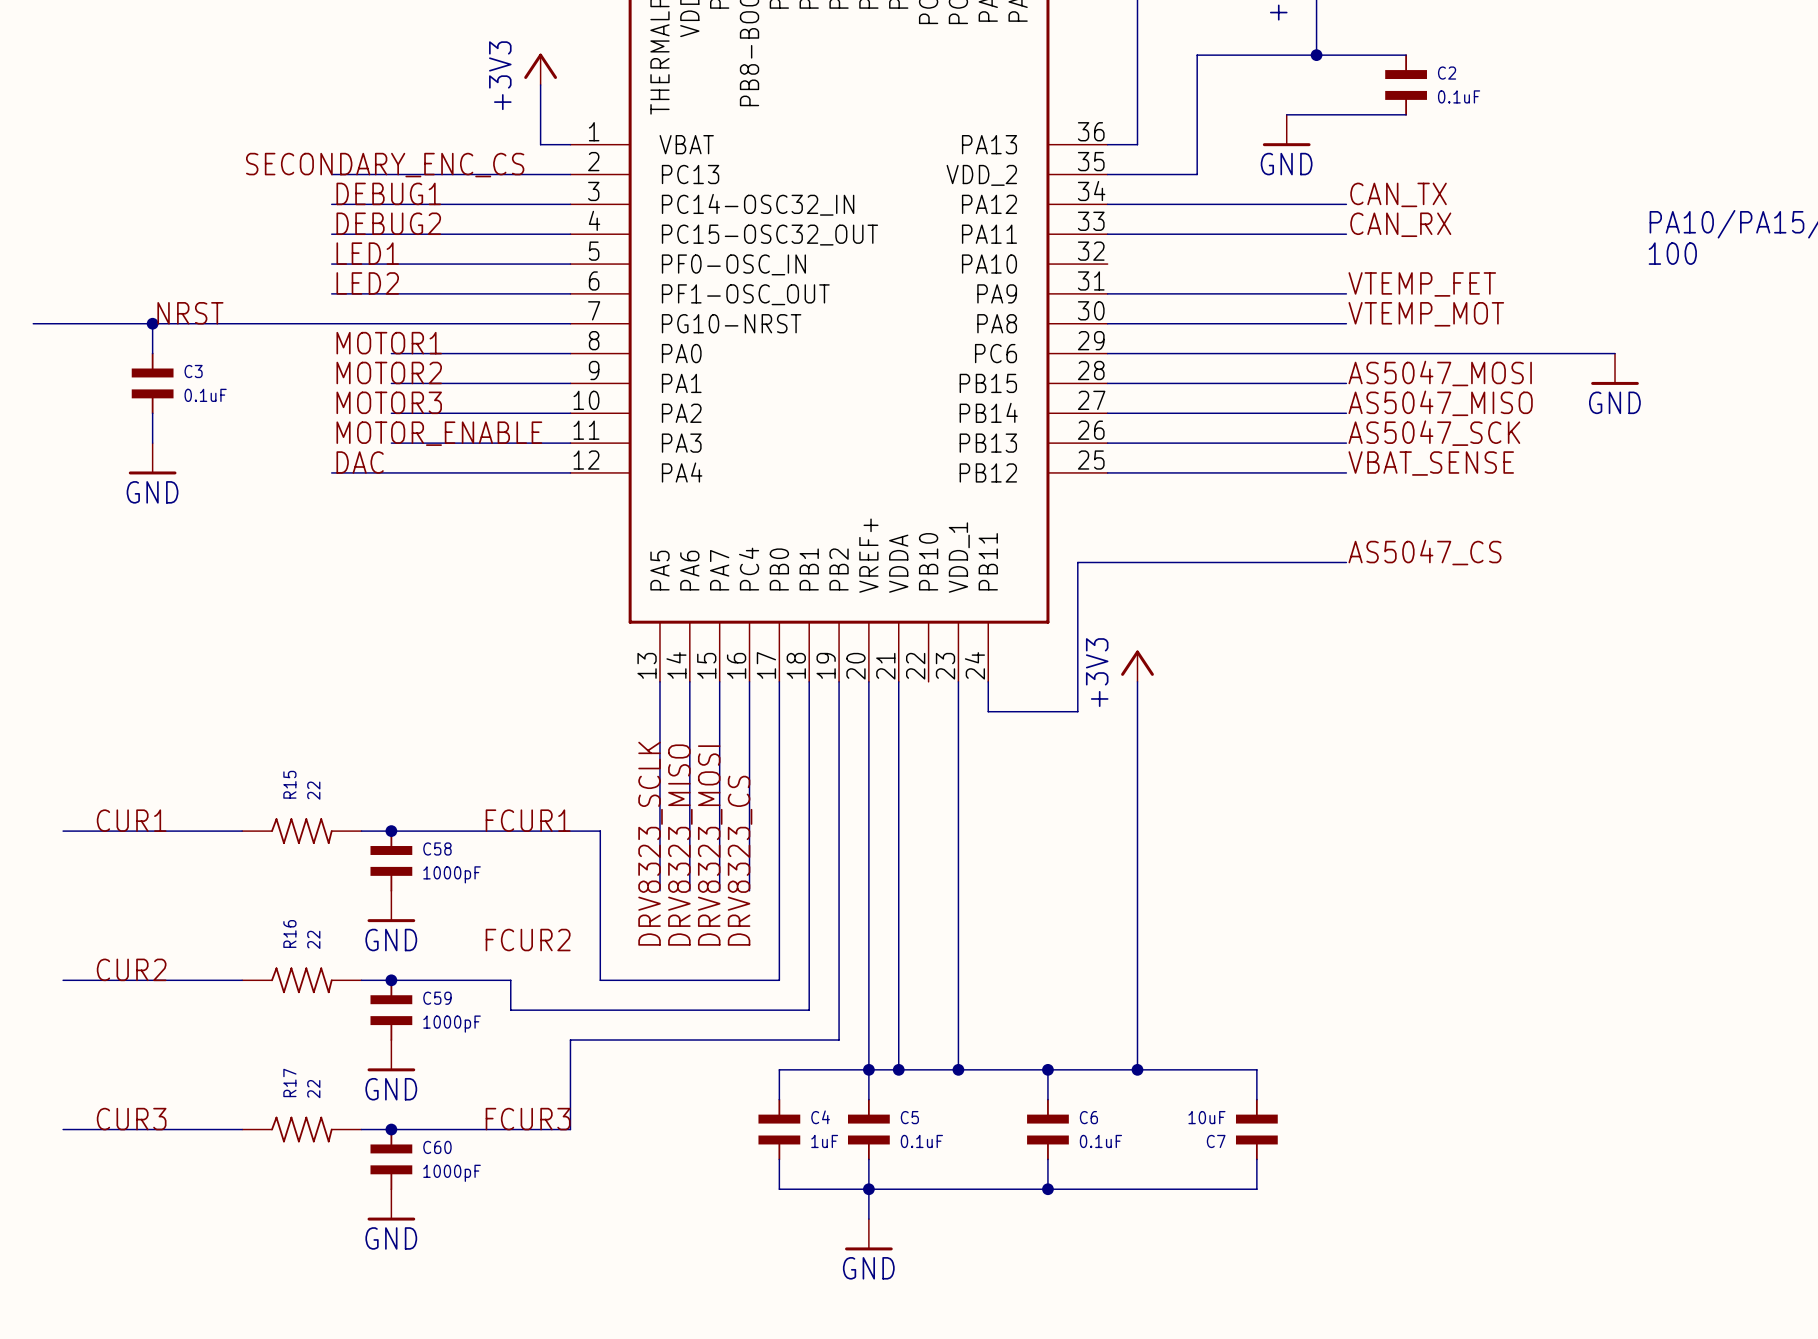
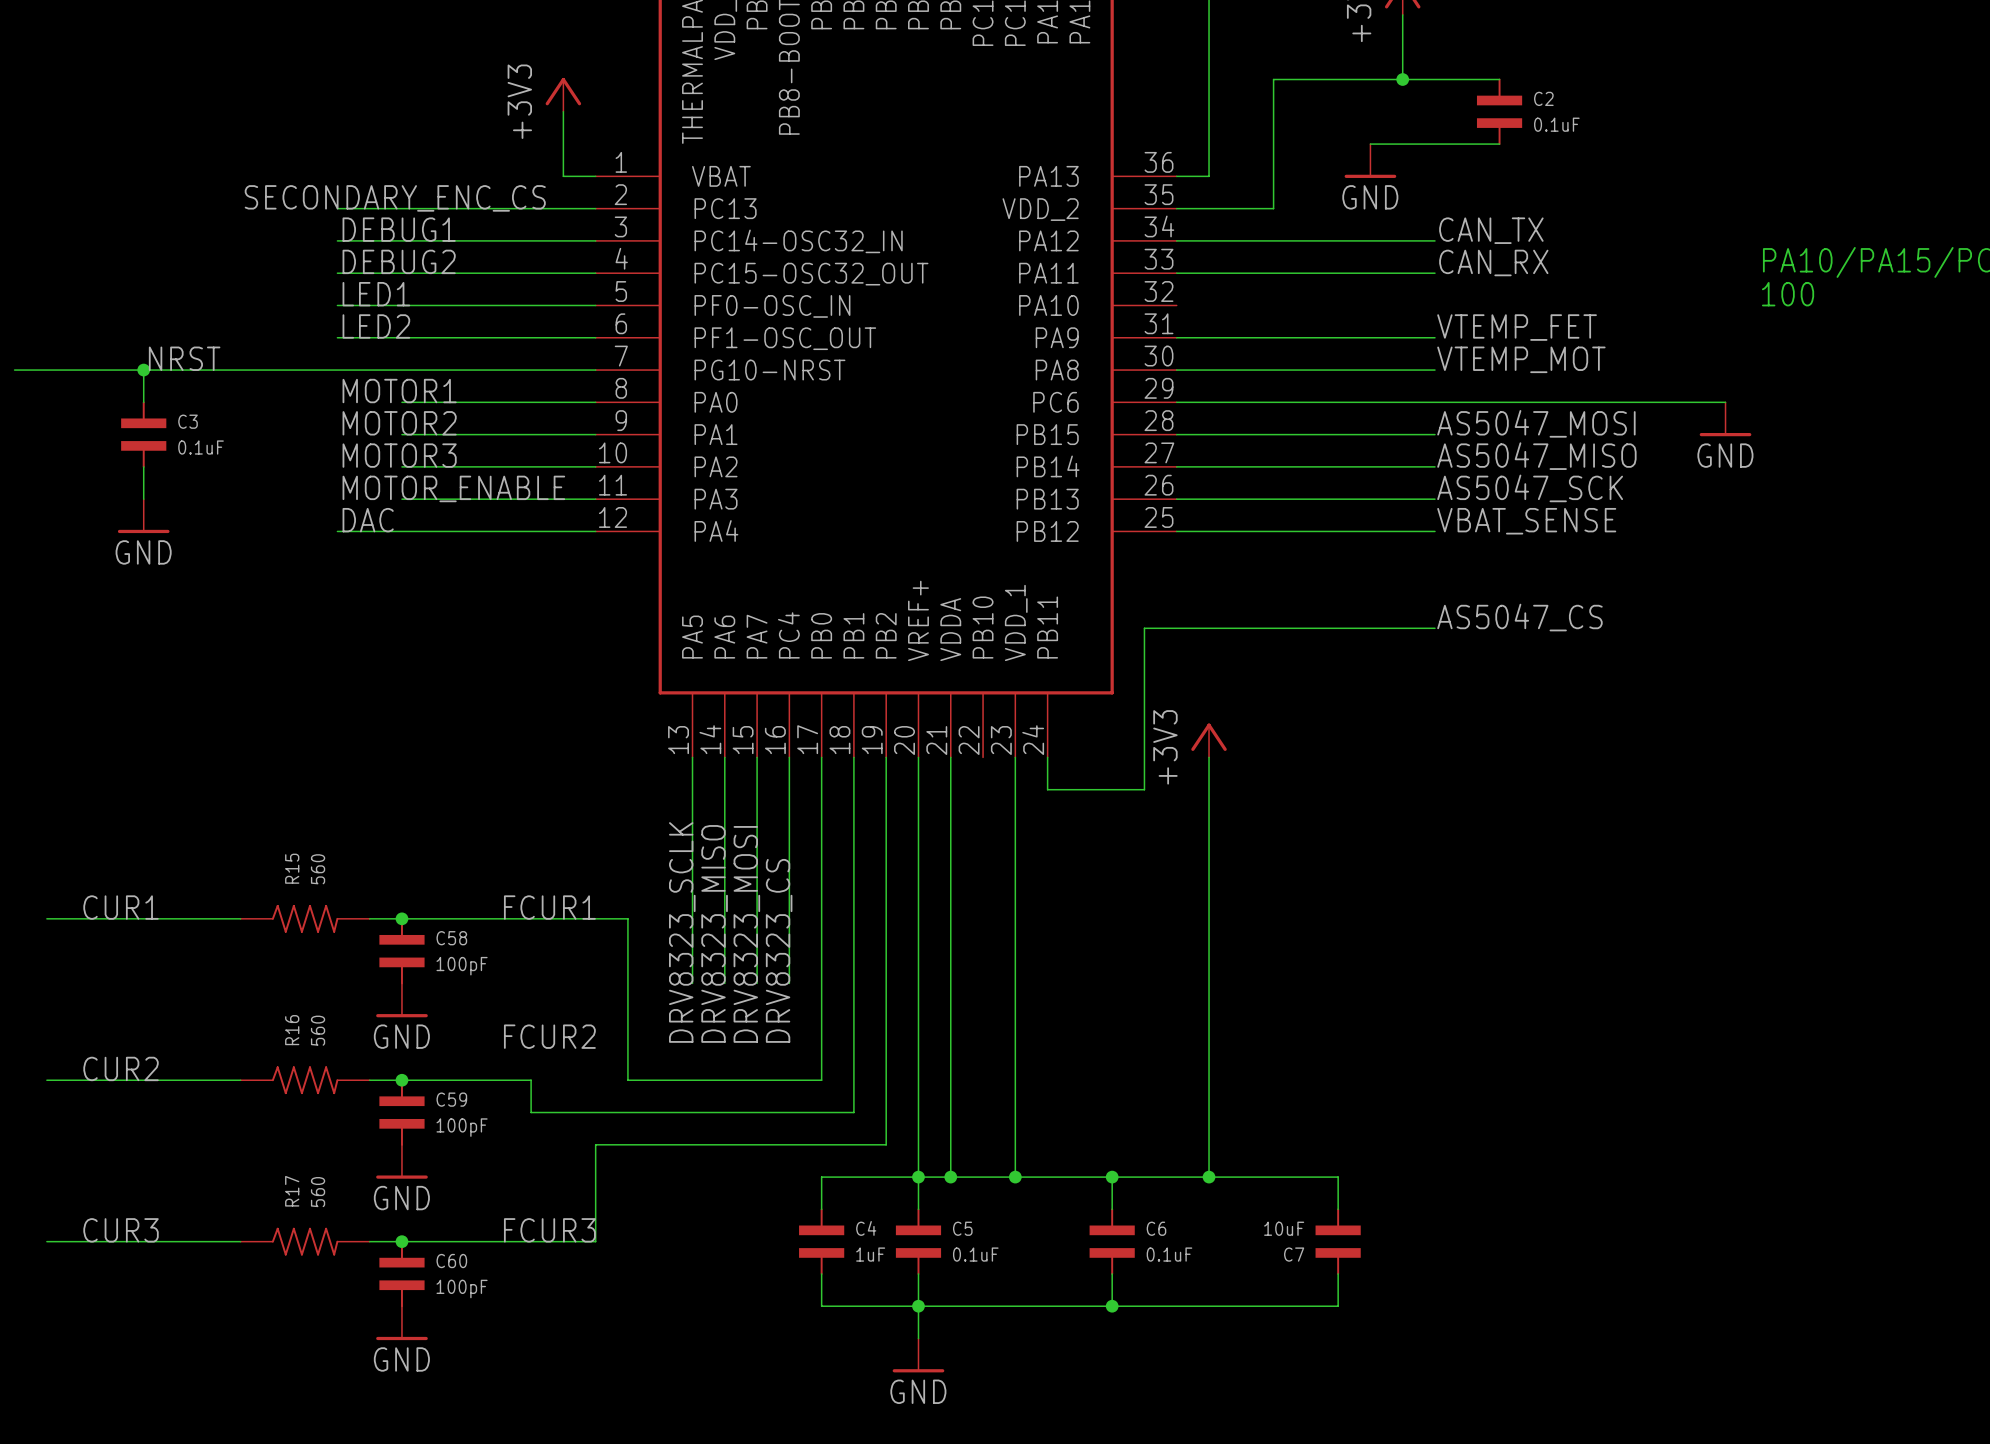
R15 value: 22 (313, 790) -> 560 (318, 869)
C58 value: 1000pF (452, 874) -> 100pF (462, 966)
R16 value: 22 (313, 939) -> 560 (318, 1030)
C59 value: 1000pF (452, 1024) -> 100pF (462, 1127)
R17 value: 22 (313, 1089) -> 560 (318, 1192)
C60 value: 1000pF (452, 1173) -> 100pF (462, 1289)

